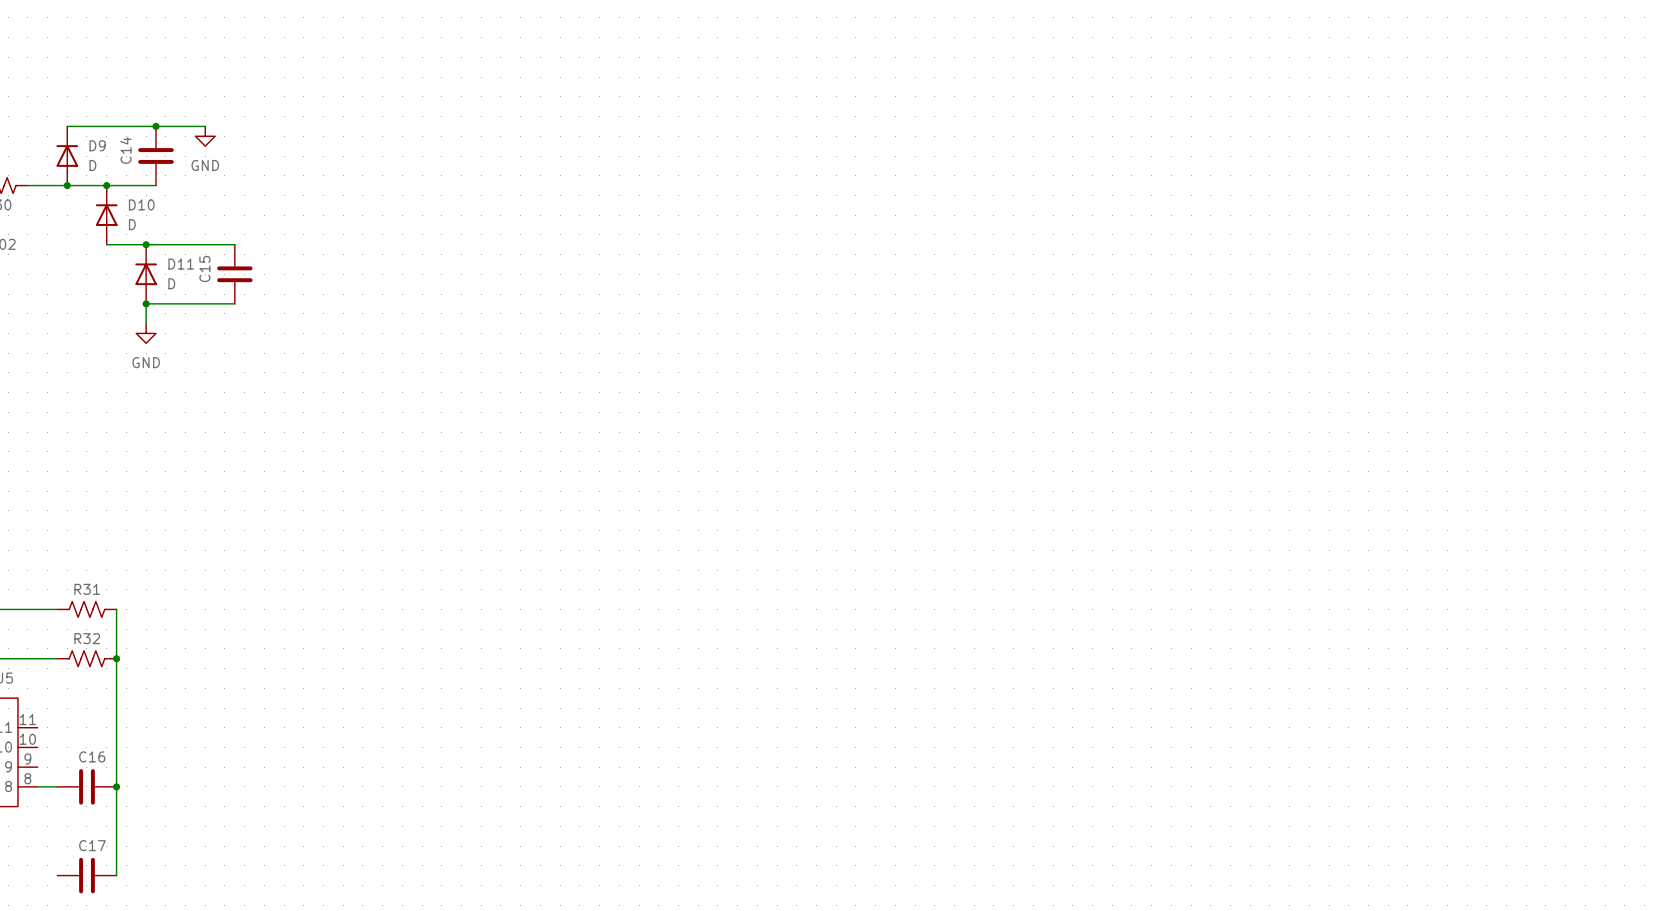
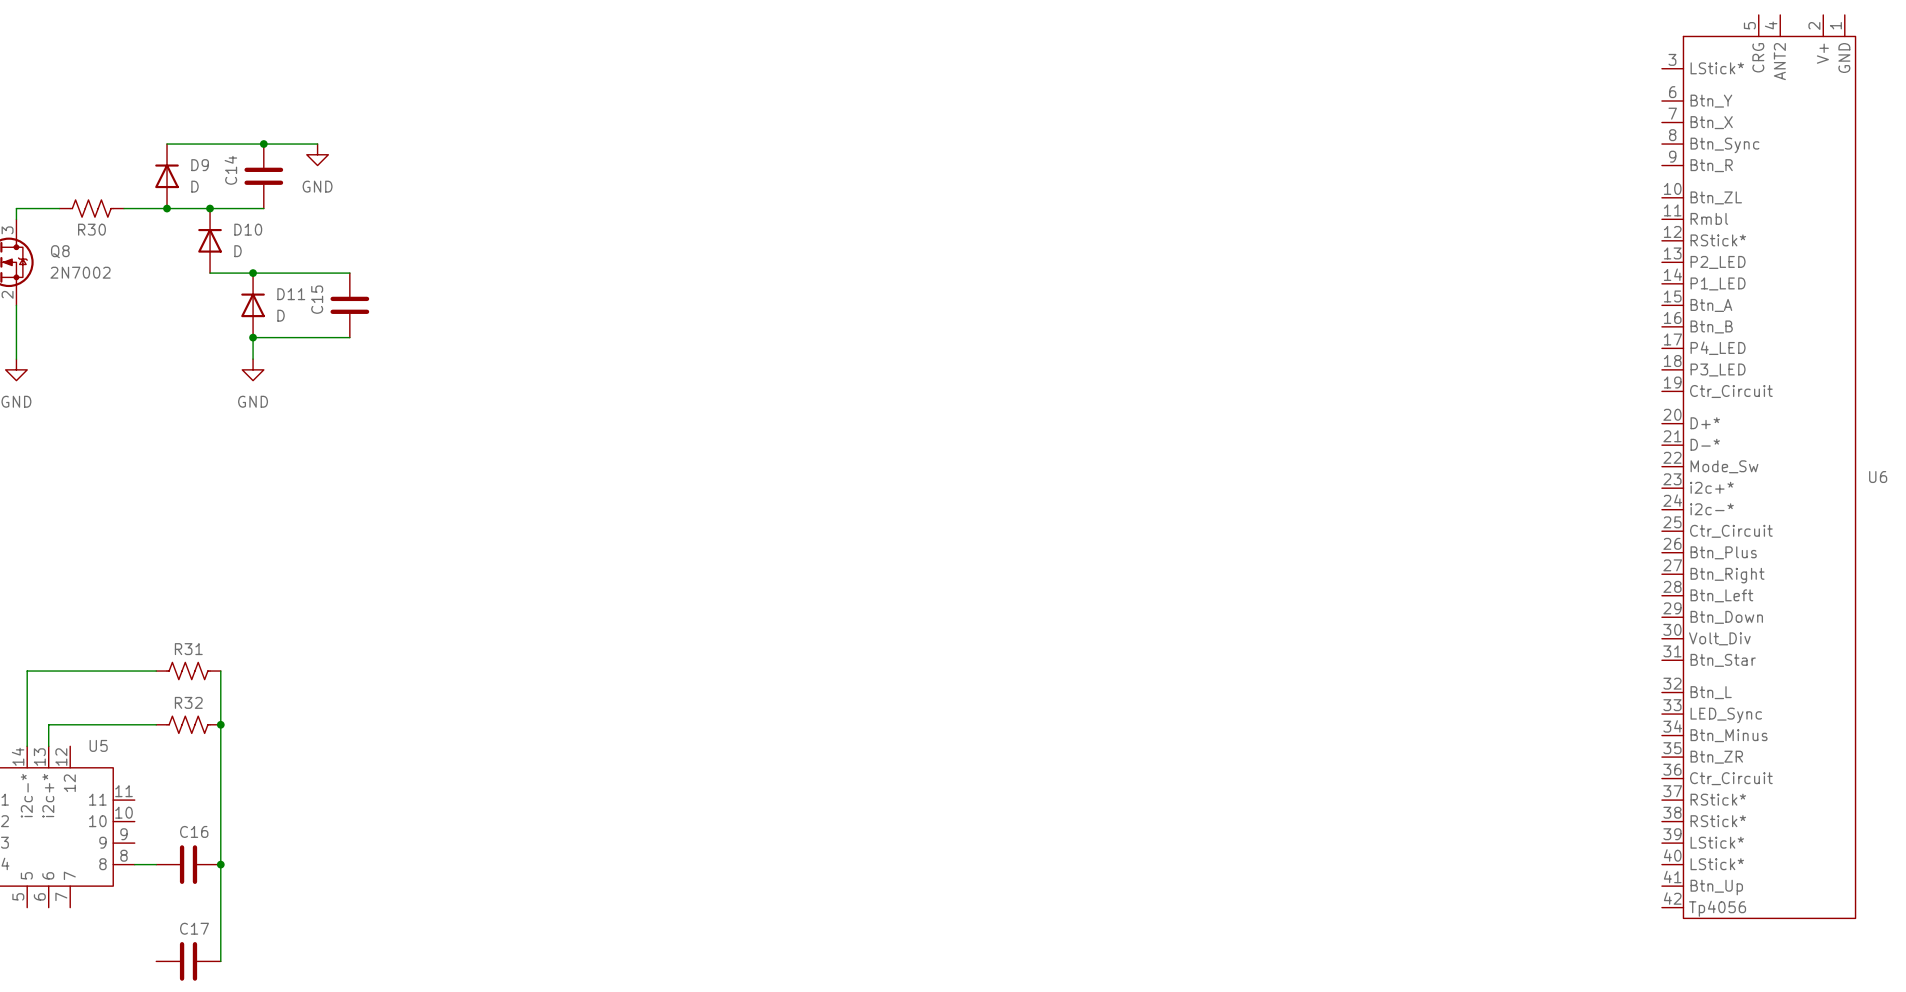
U6: none -> (1758, 466)

